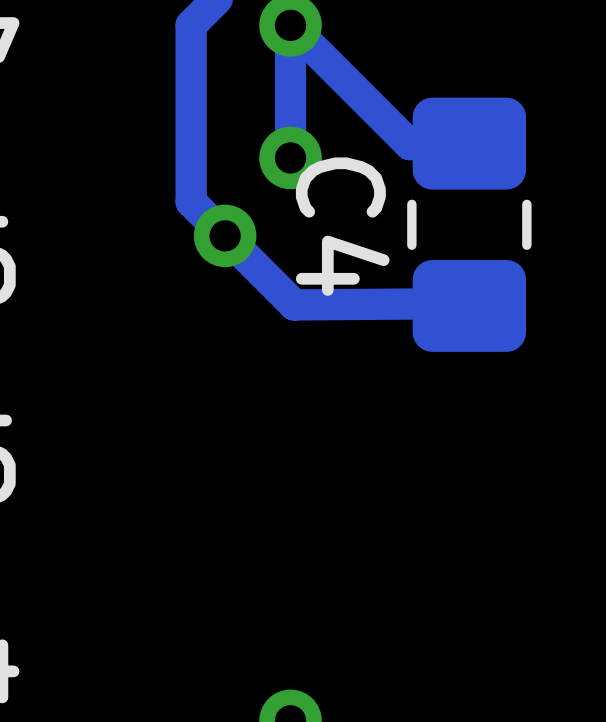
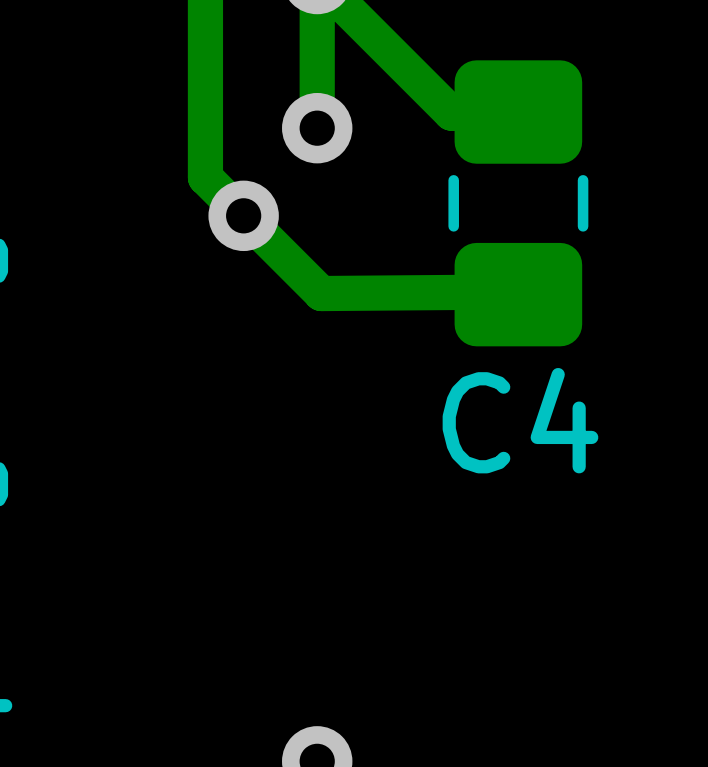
C4 name rotation: 0° (342, 226) -> 90° counterclockwise (520, 420)
C4 name position: C4 (342, 226) -> C4 (520, 420)

